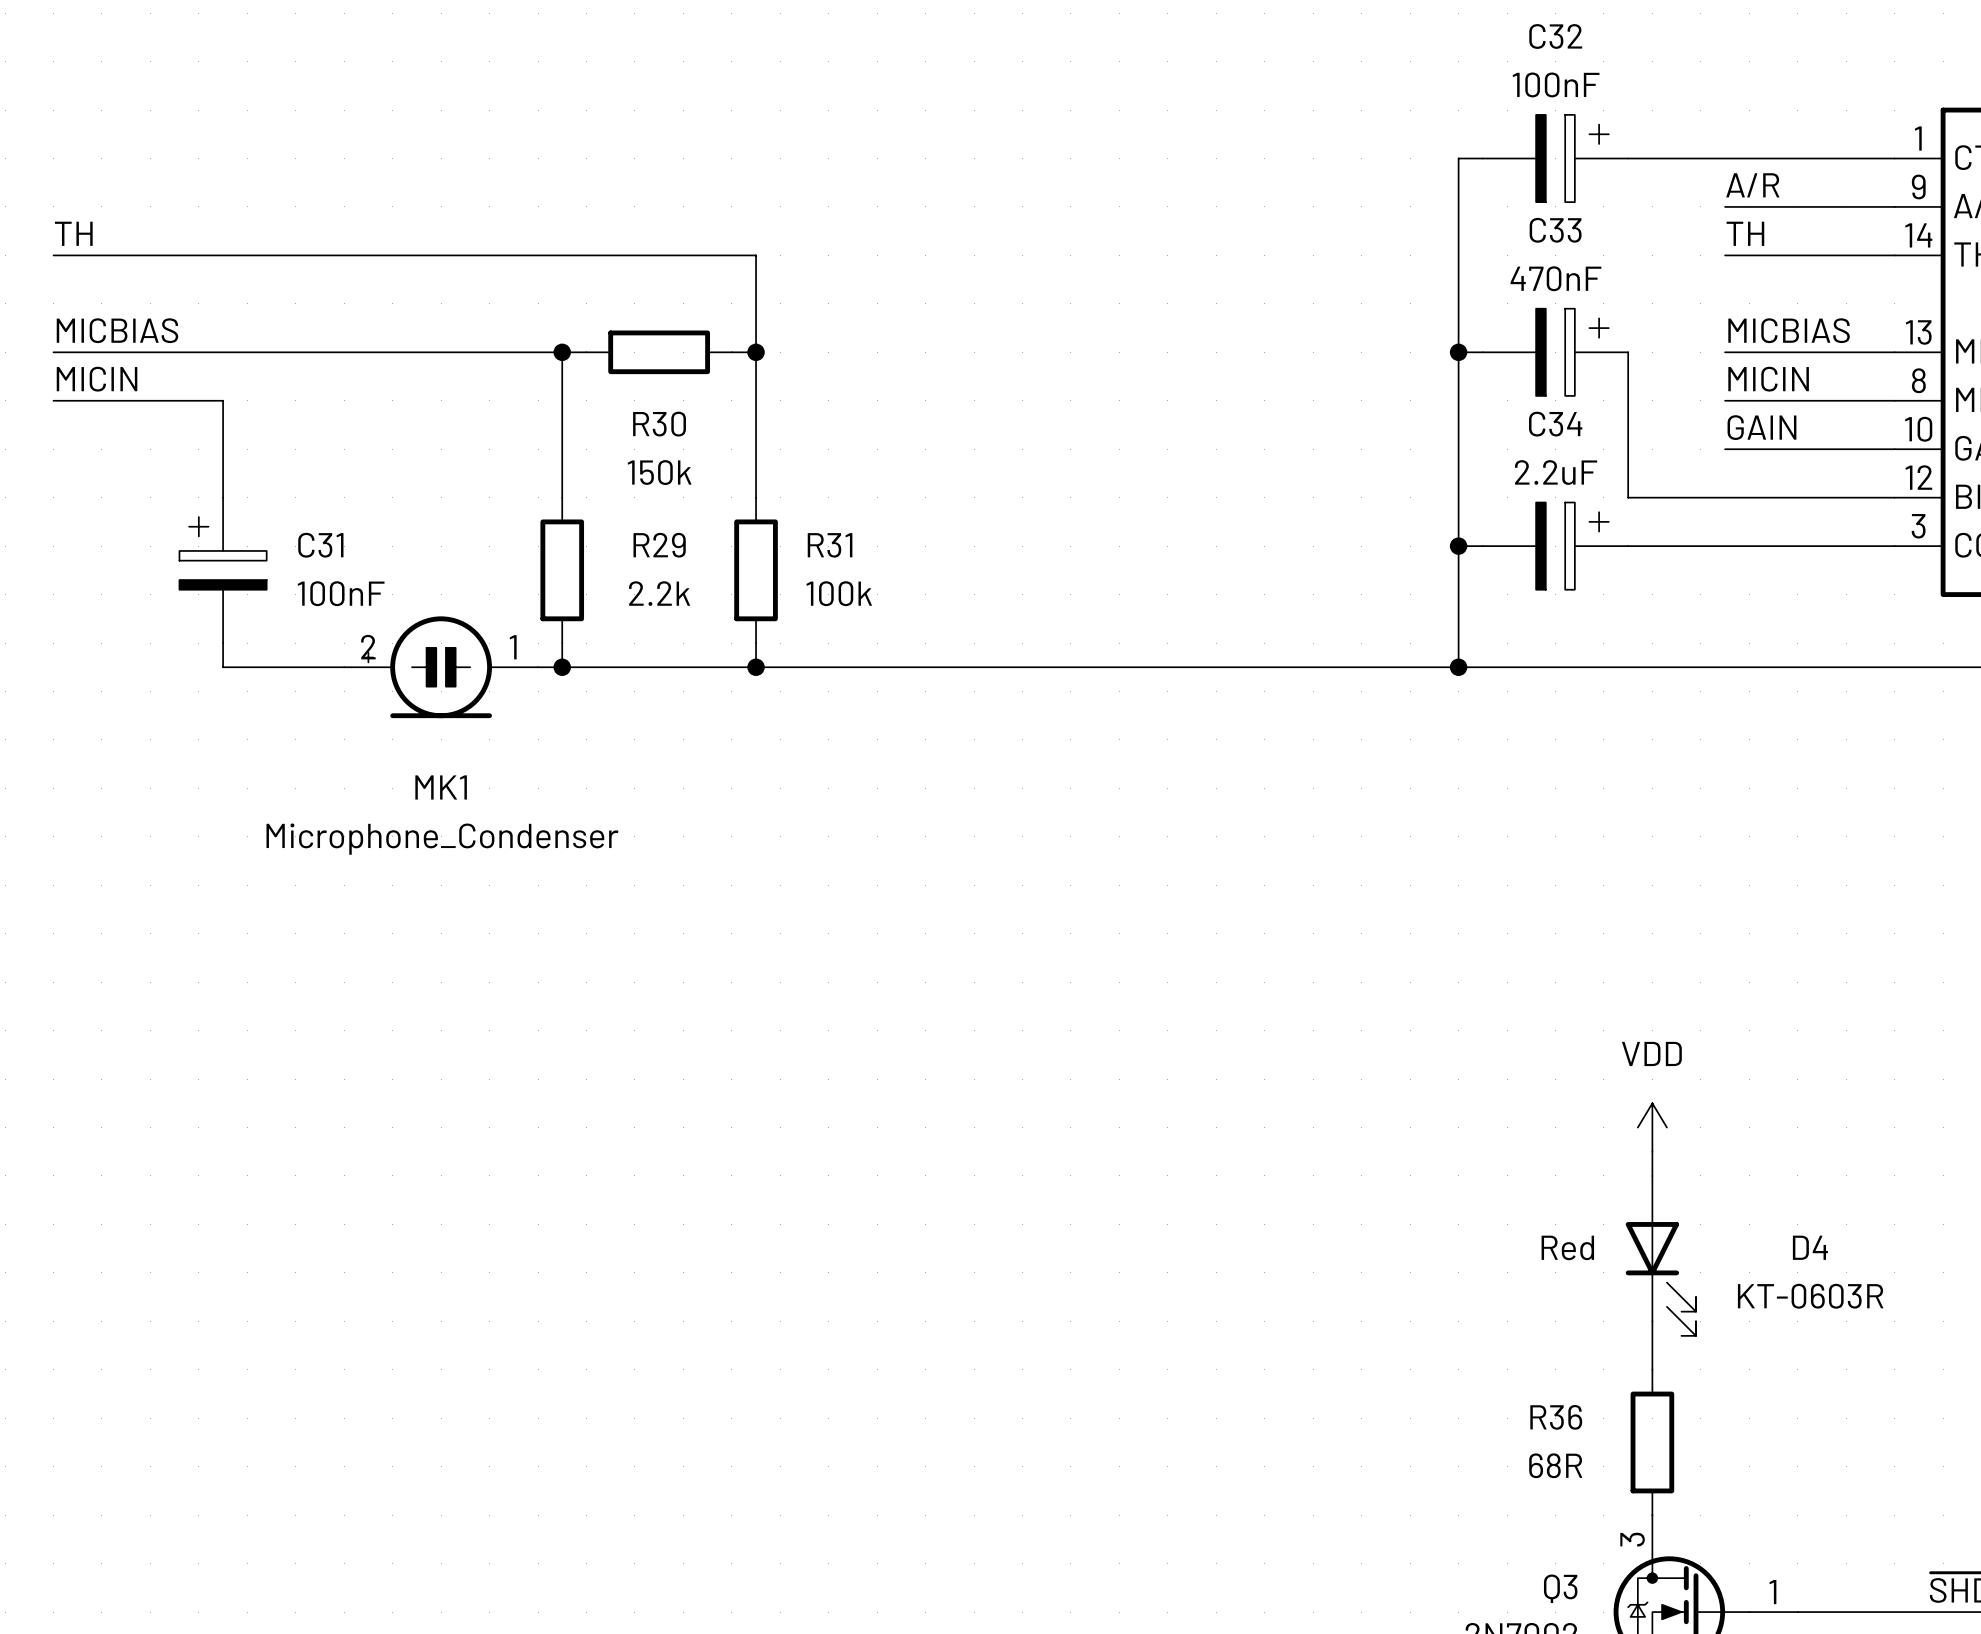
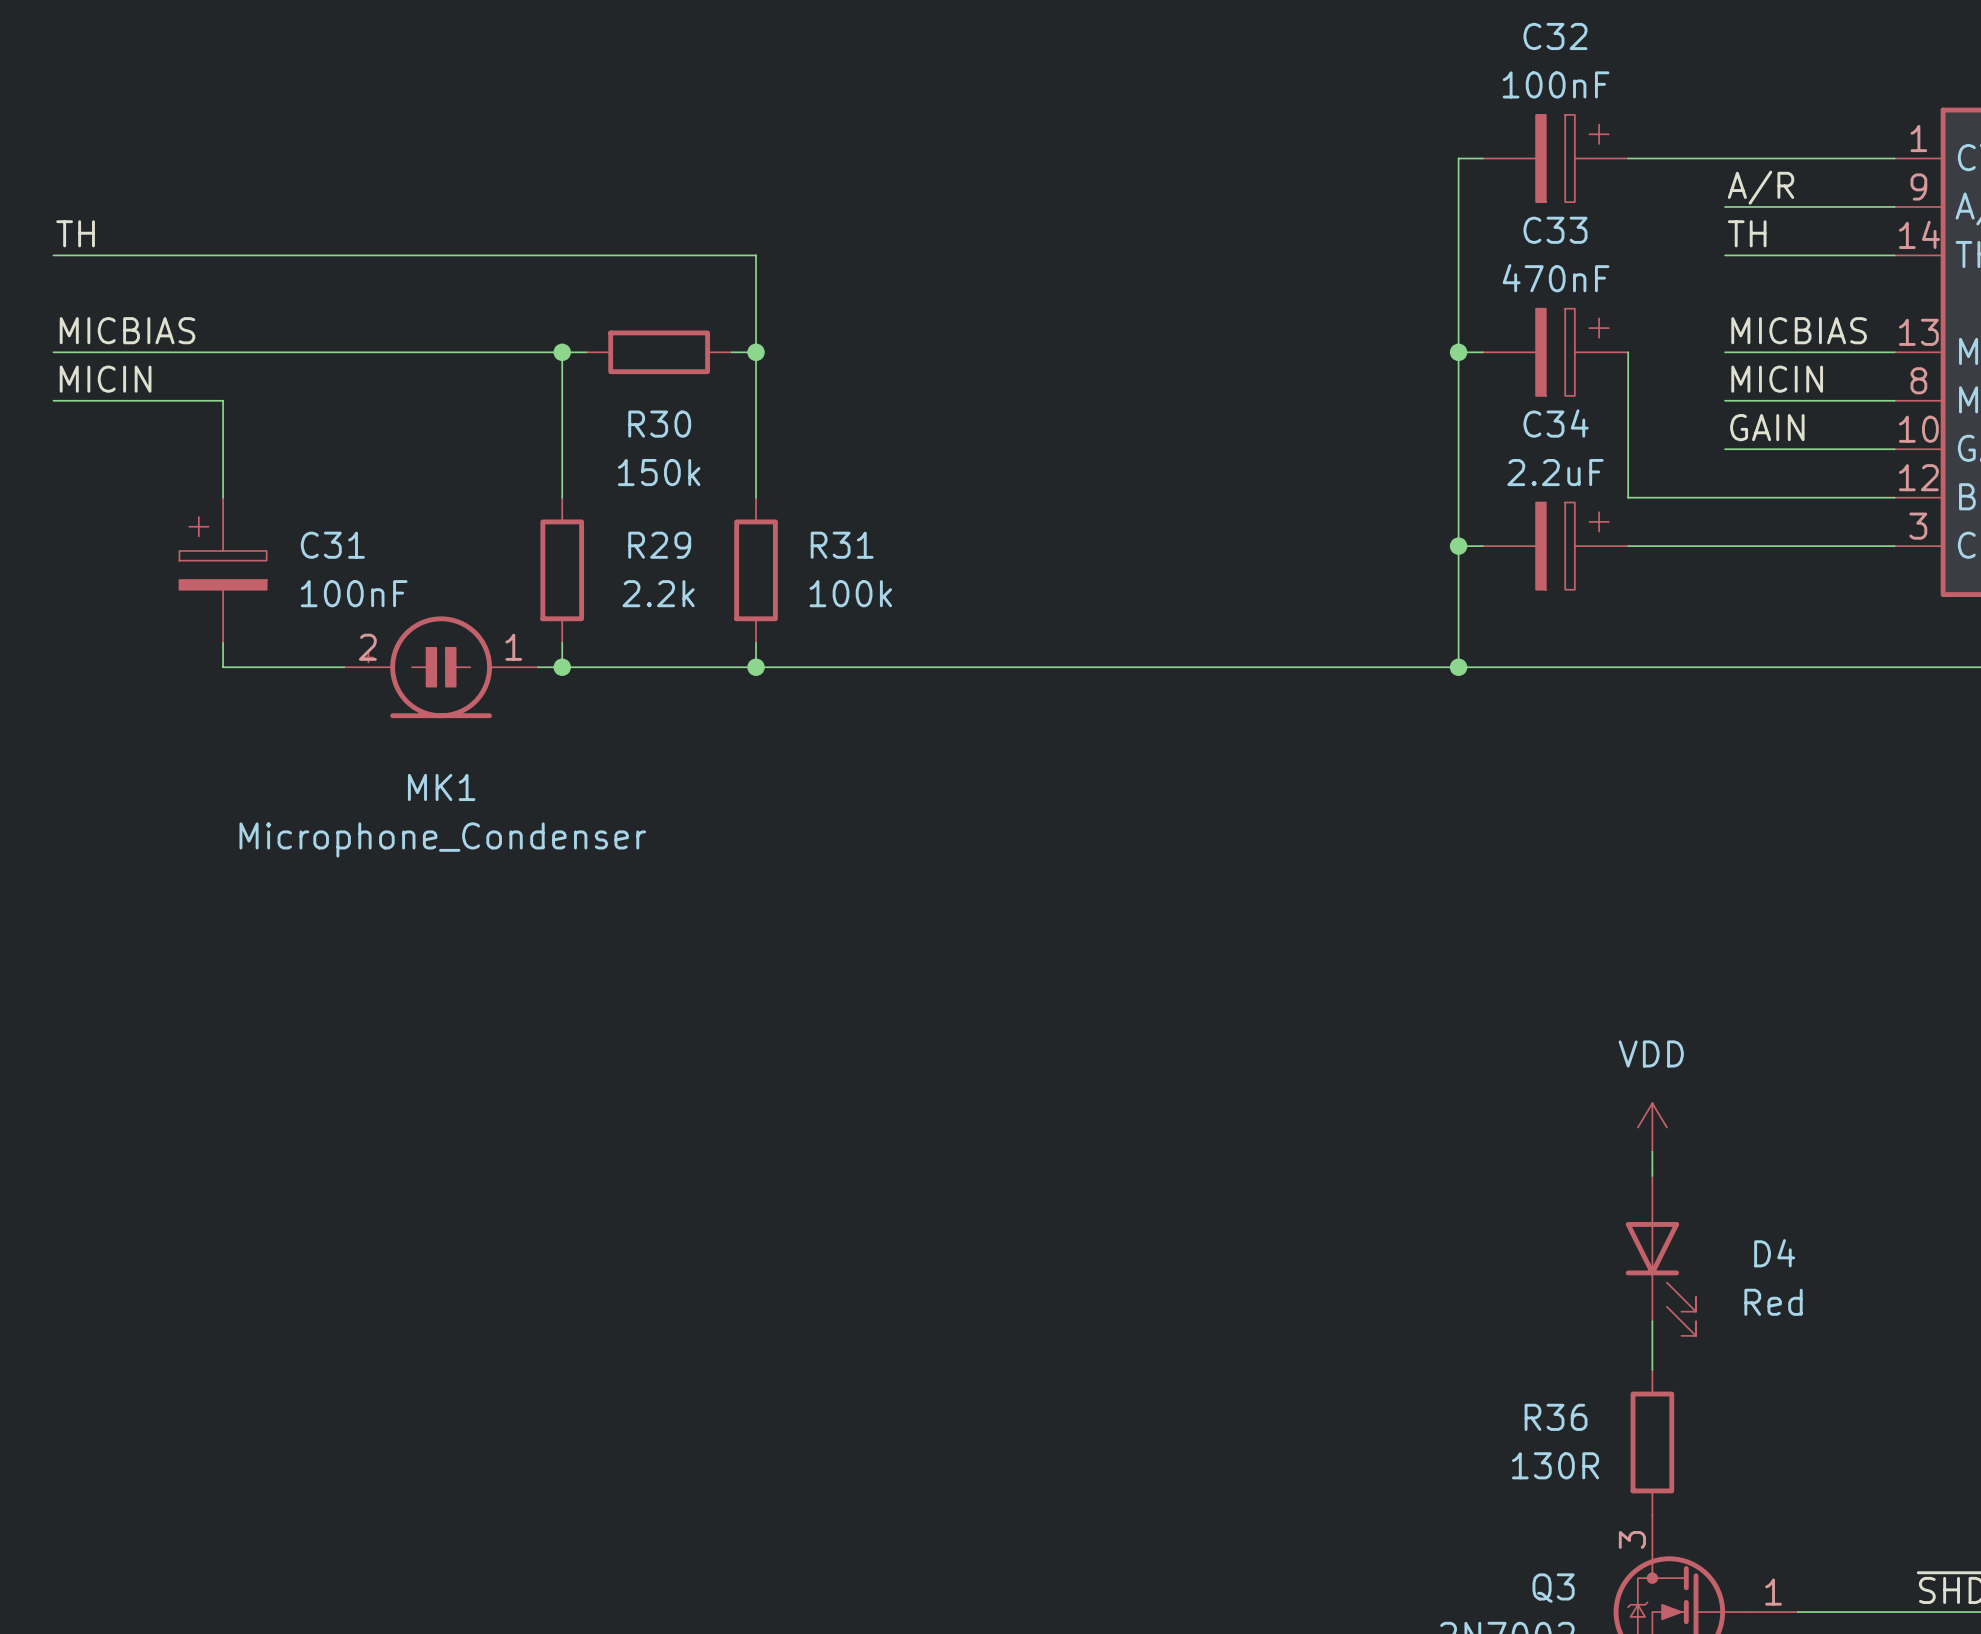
D4 text: Red (1567, 1247) -> none
D4 name position: D4 (1810, 1247) -> D4 (1774, 1253)
D4 value: KT-0603R (1810, 1296) -> Red (1773, 1302)
R36 value: 68R (1555, 1465) -> 130R (1555, 1465)

